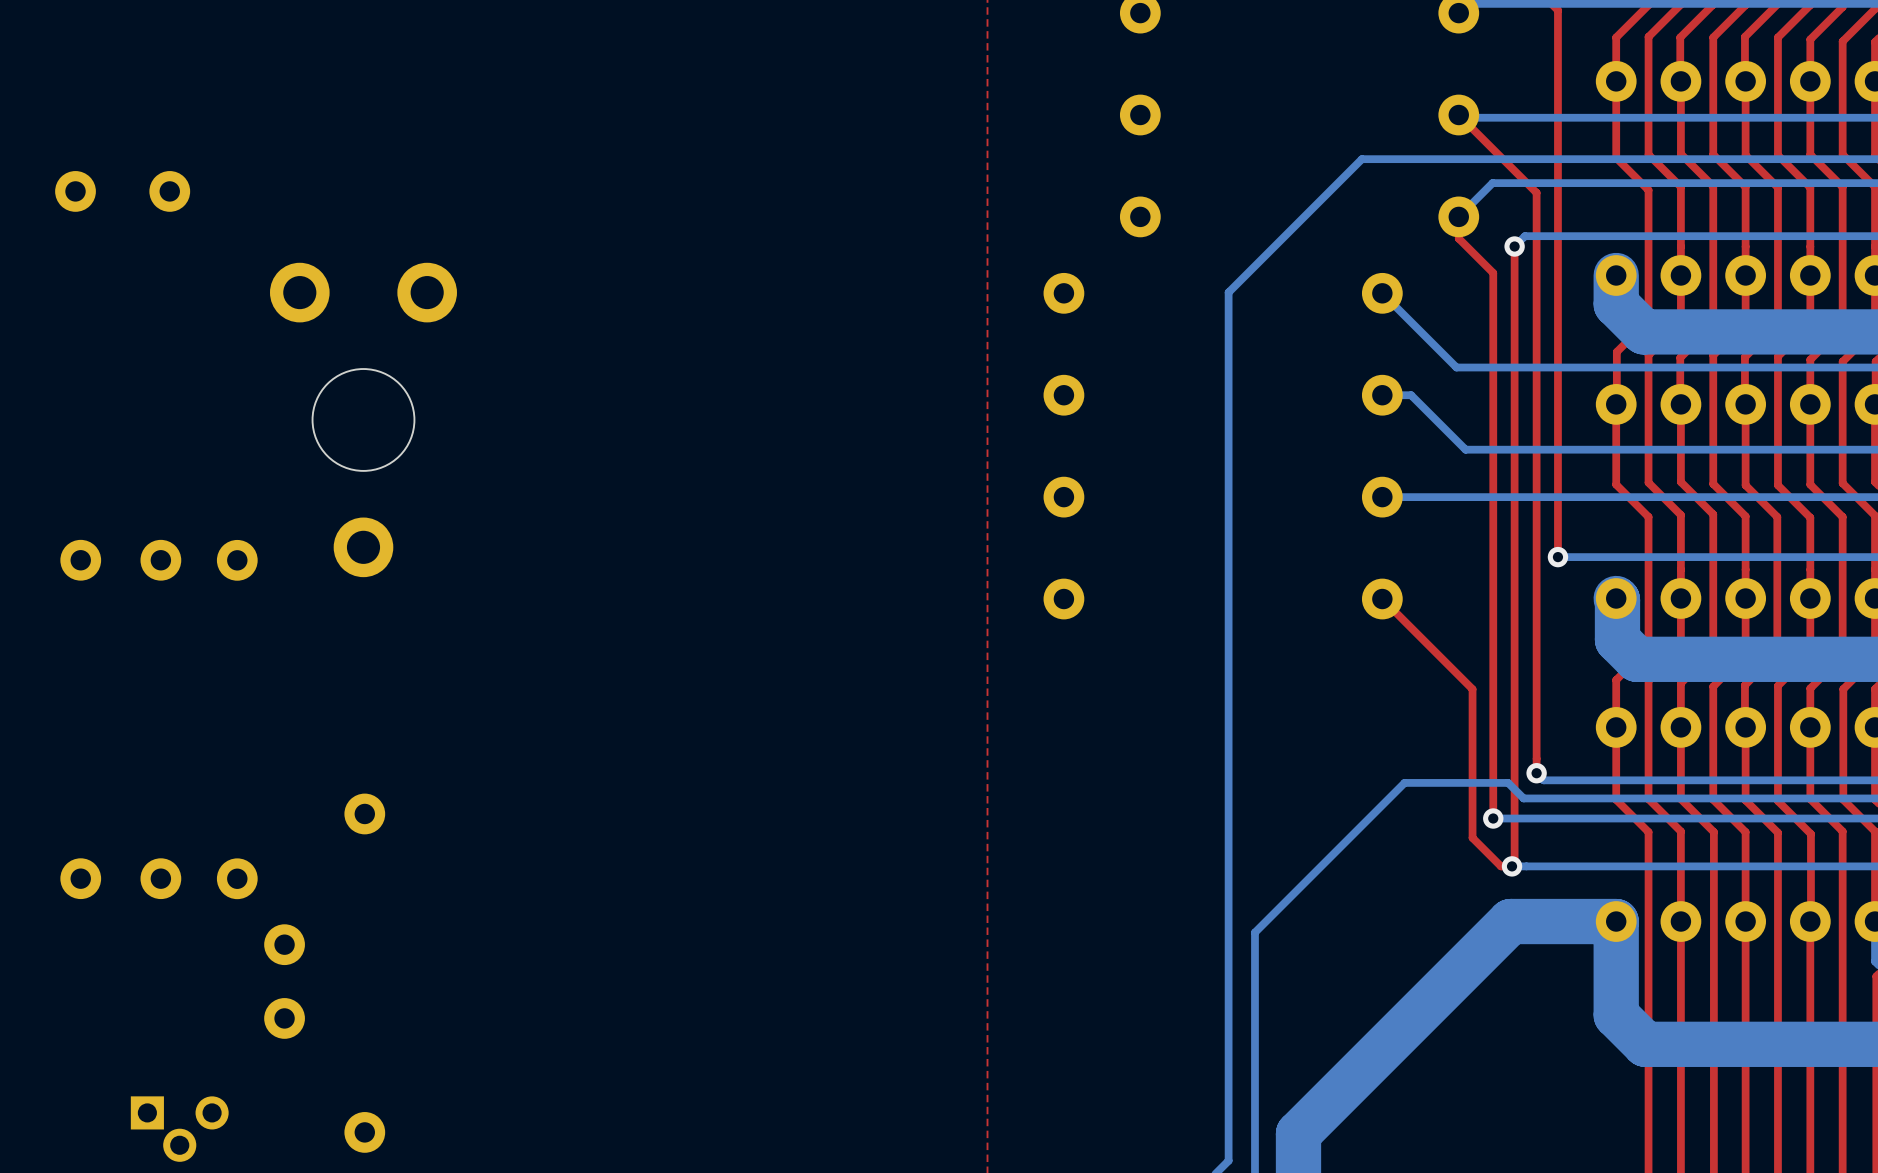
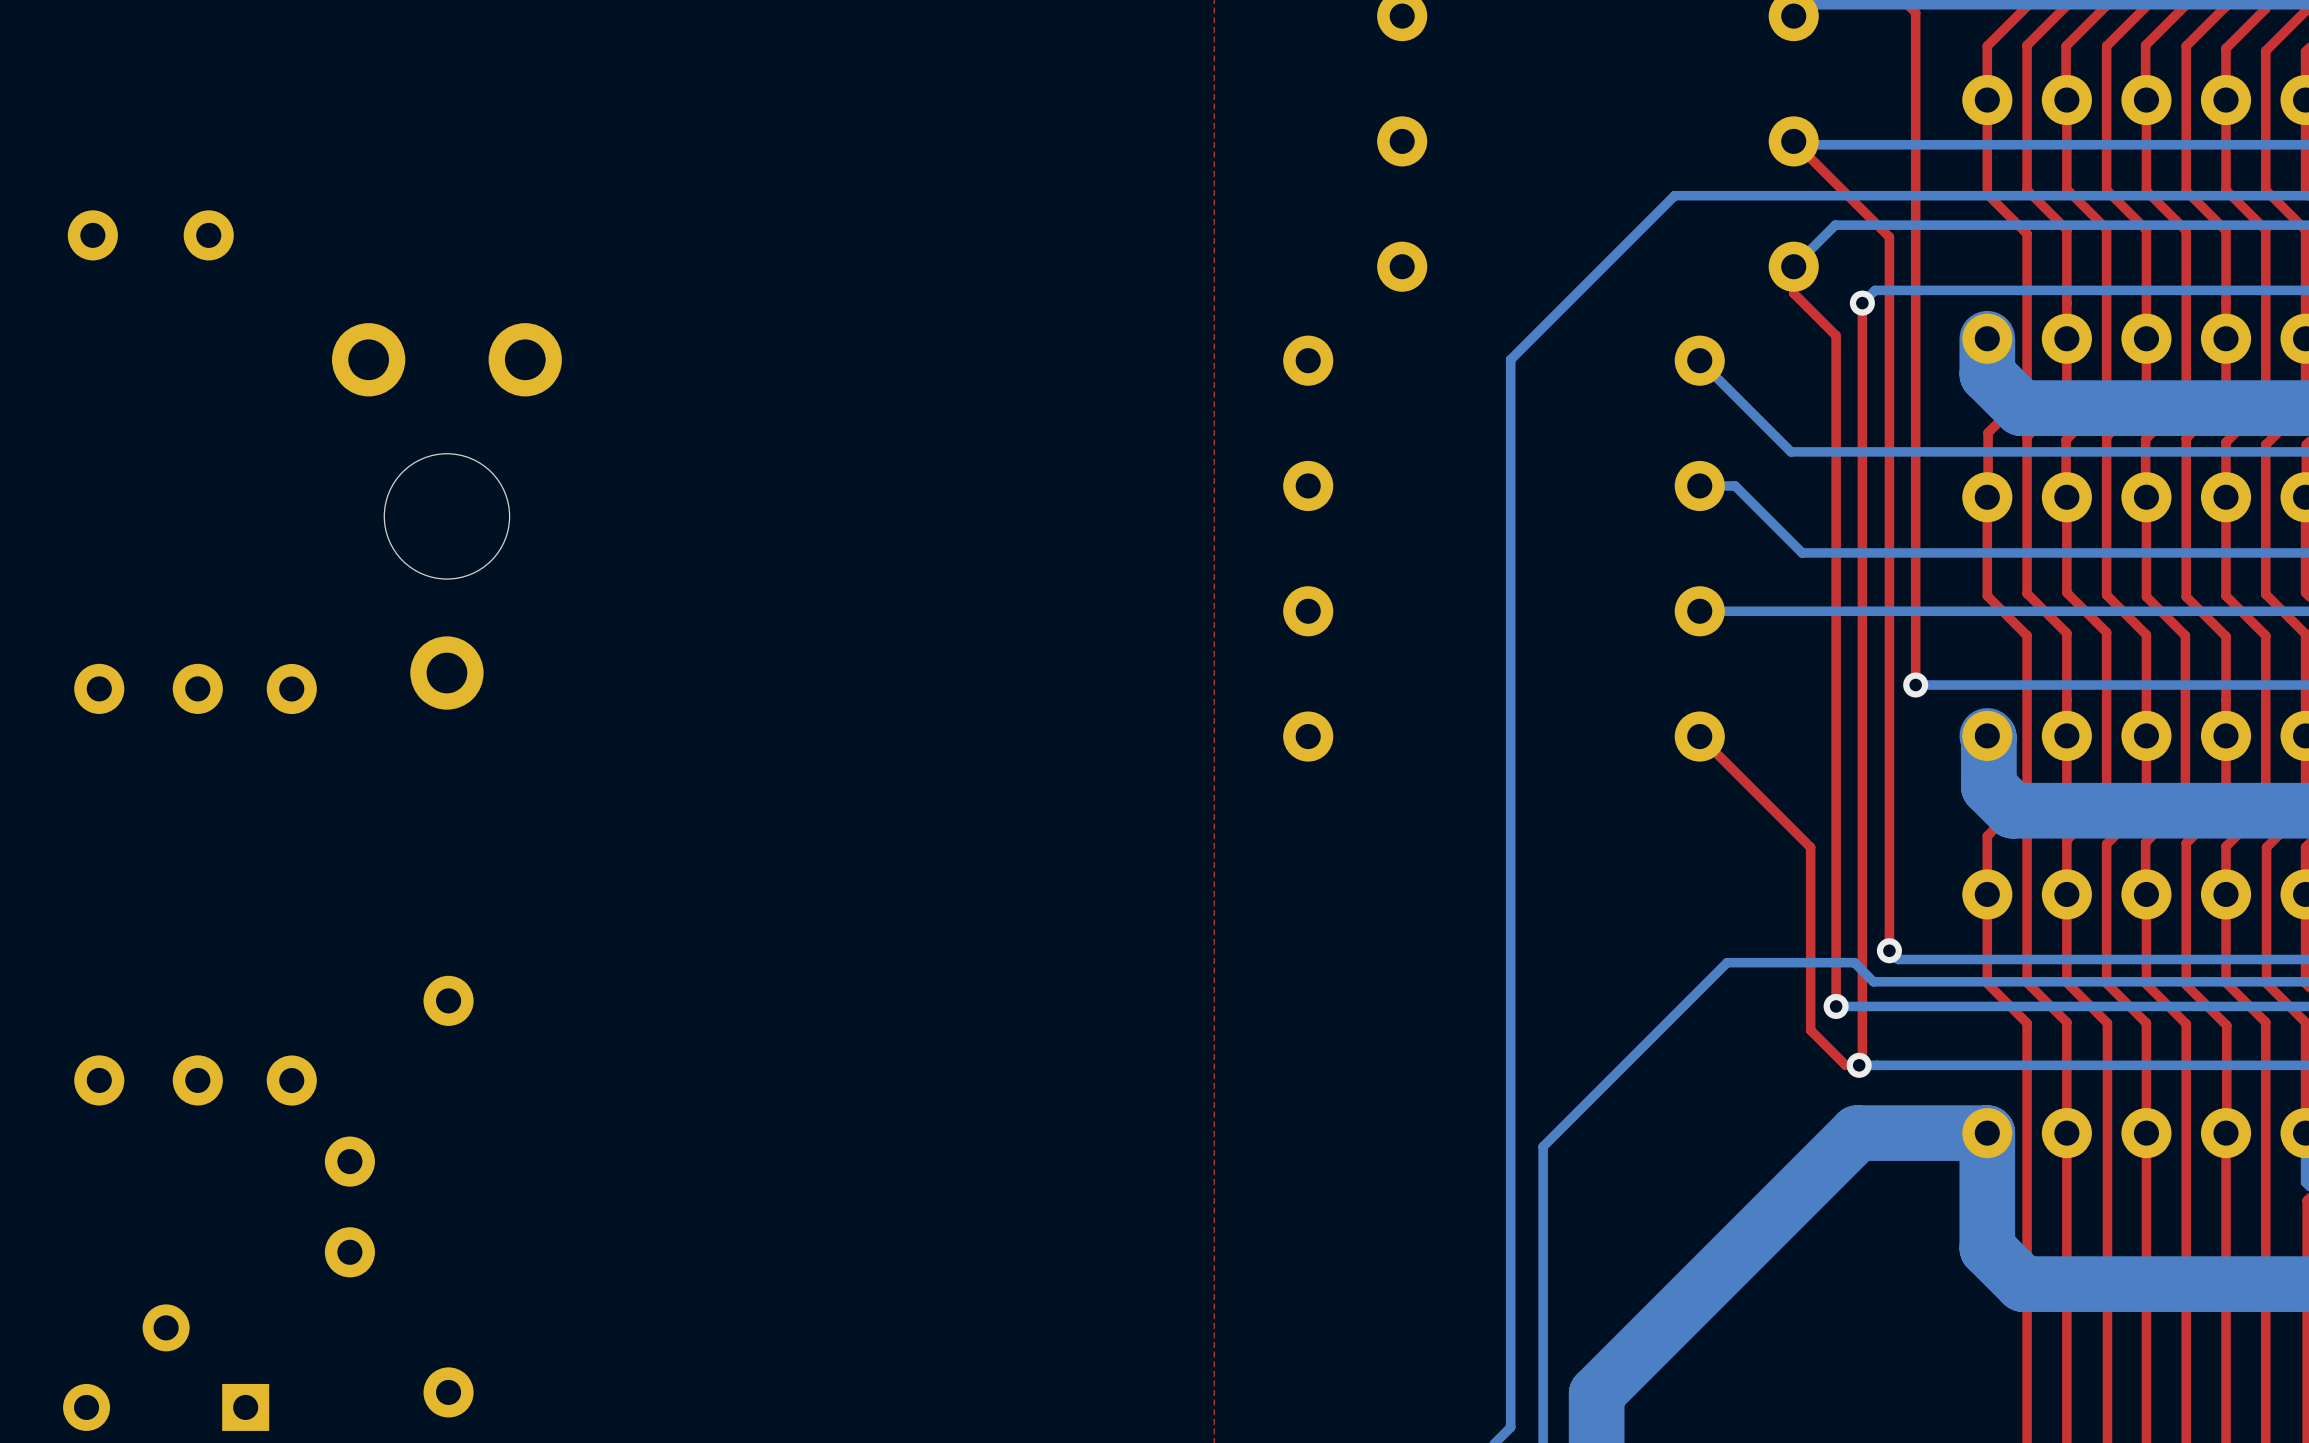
part: none -> (166, 1367)
part: (179, 1129) -> none

